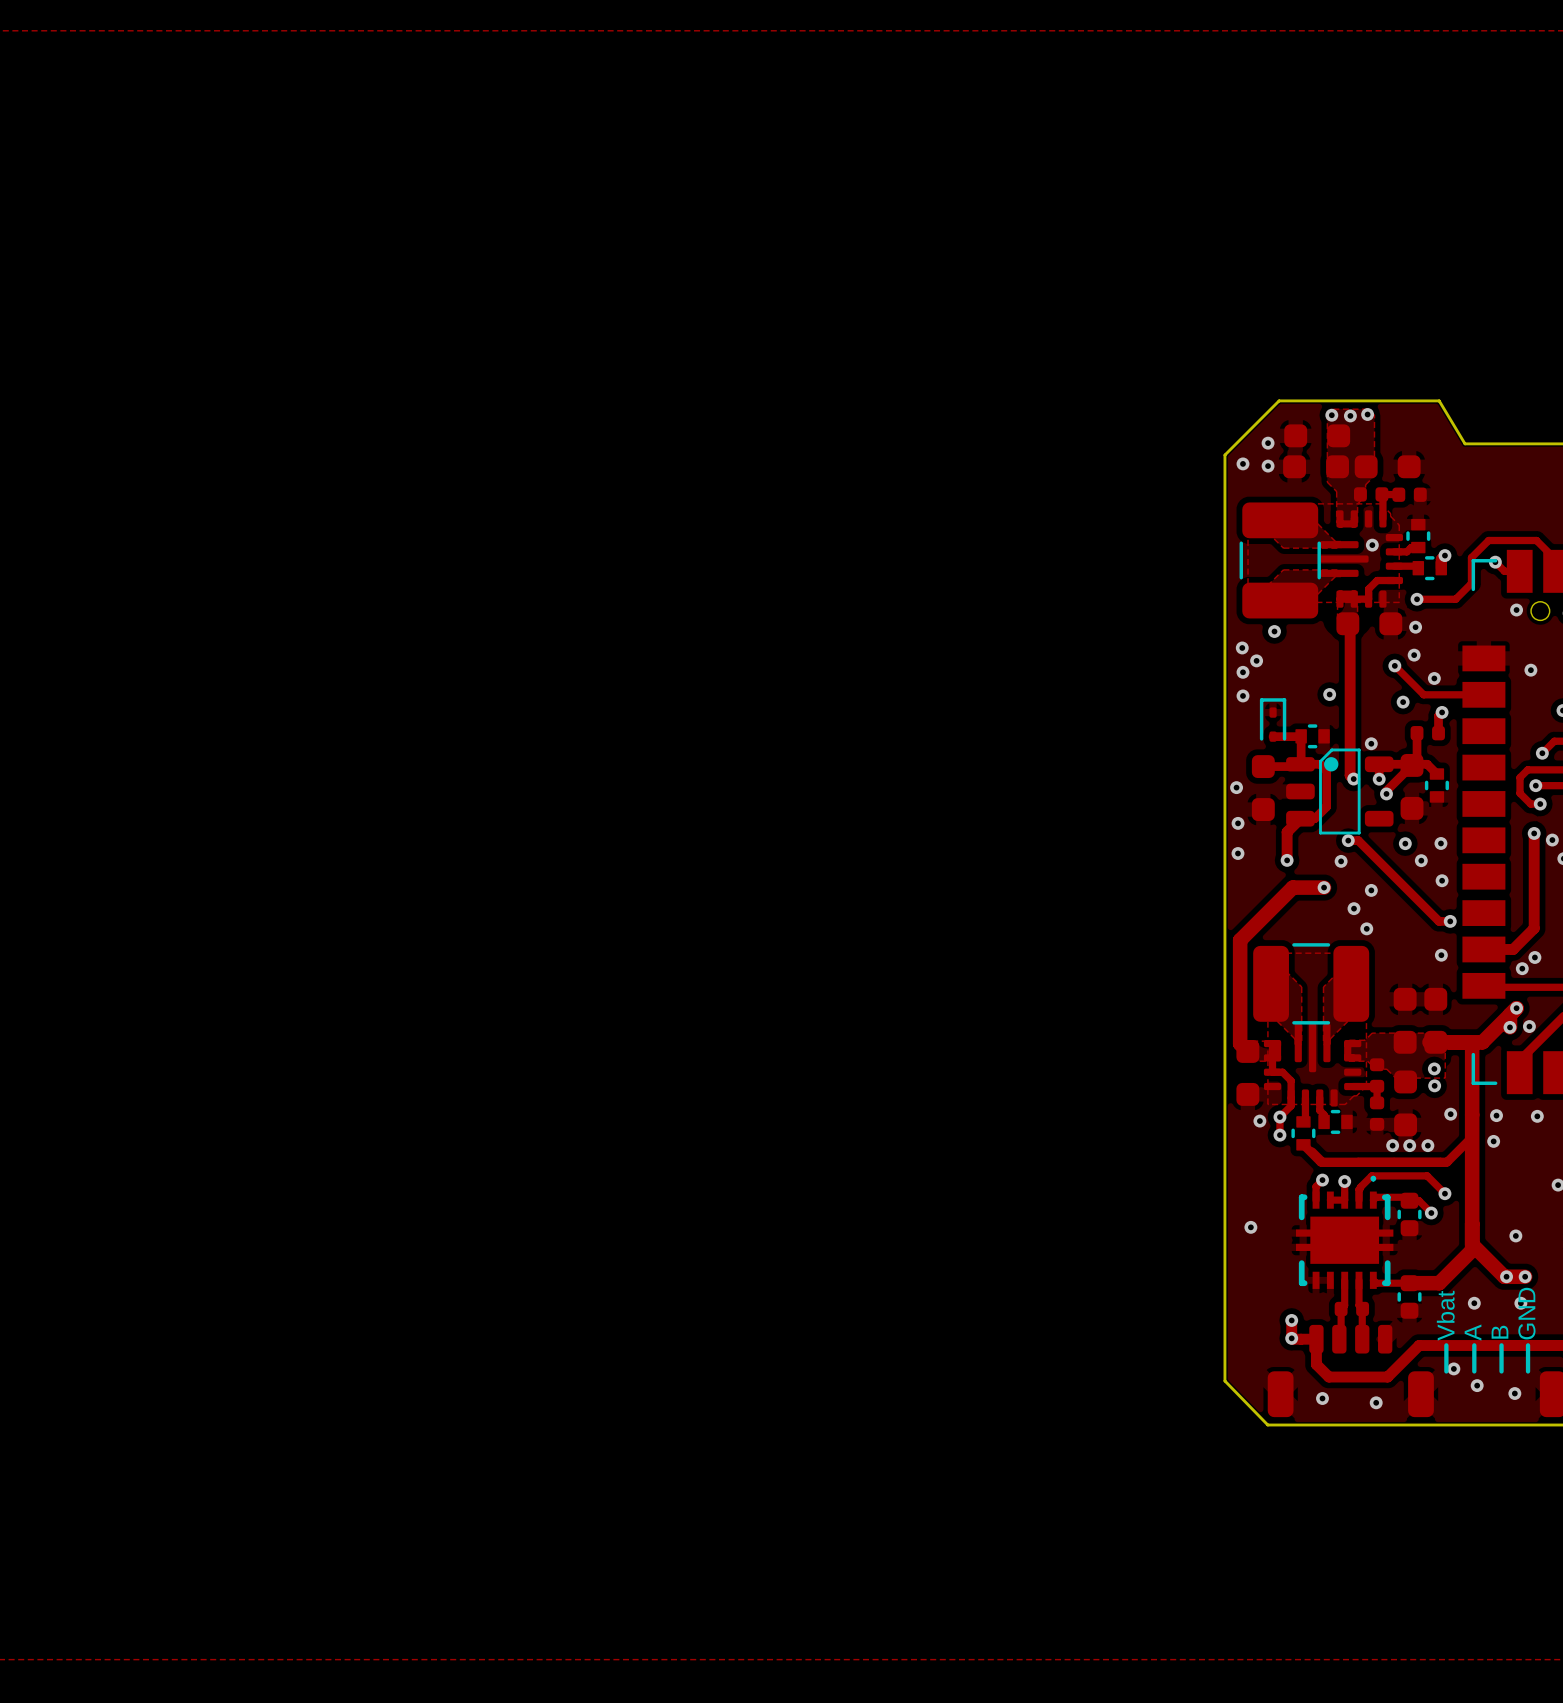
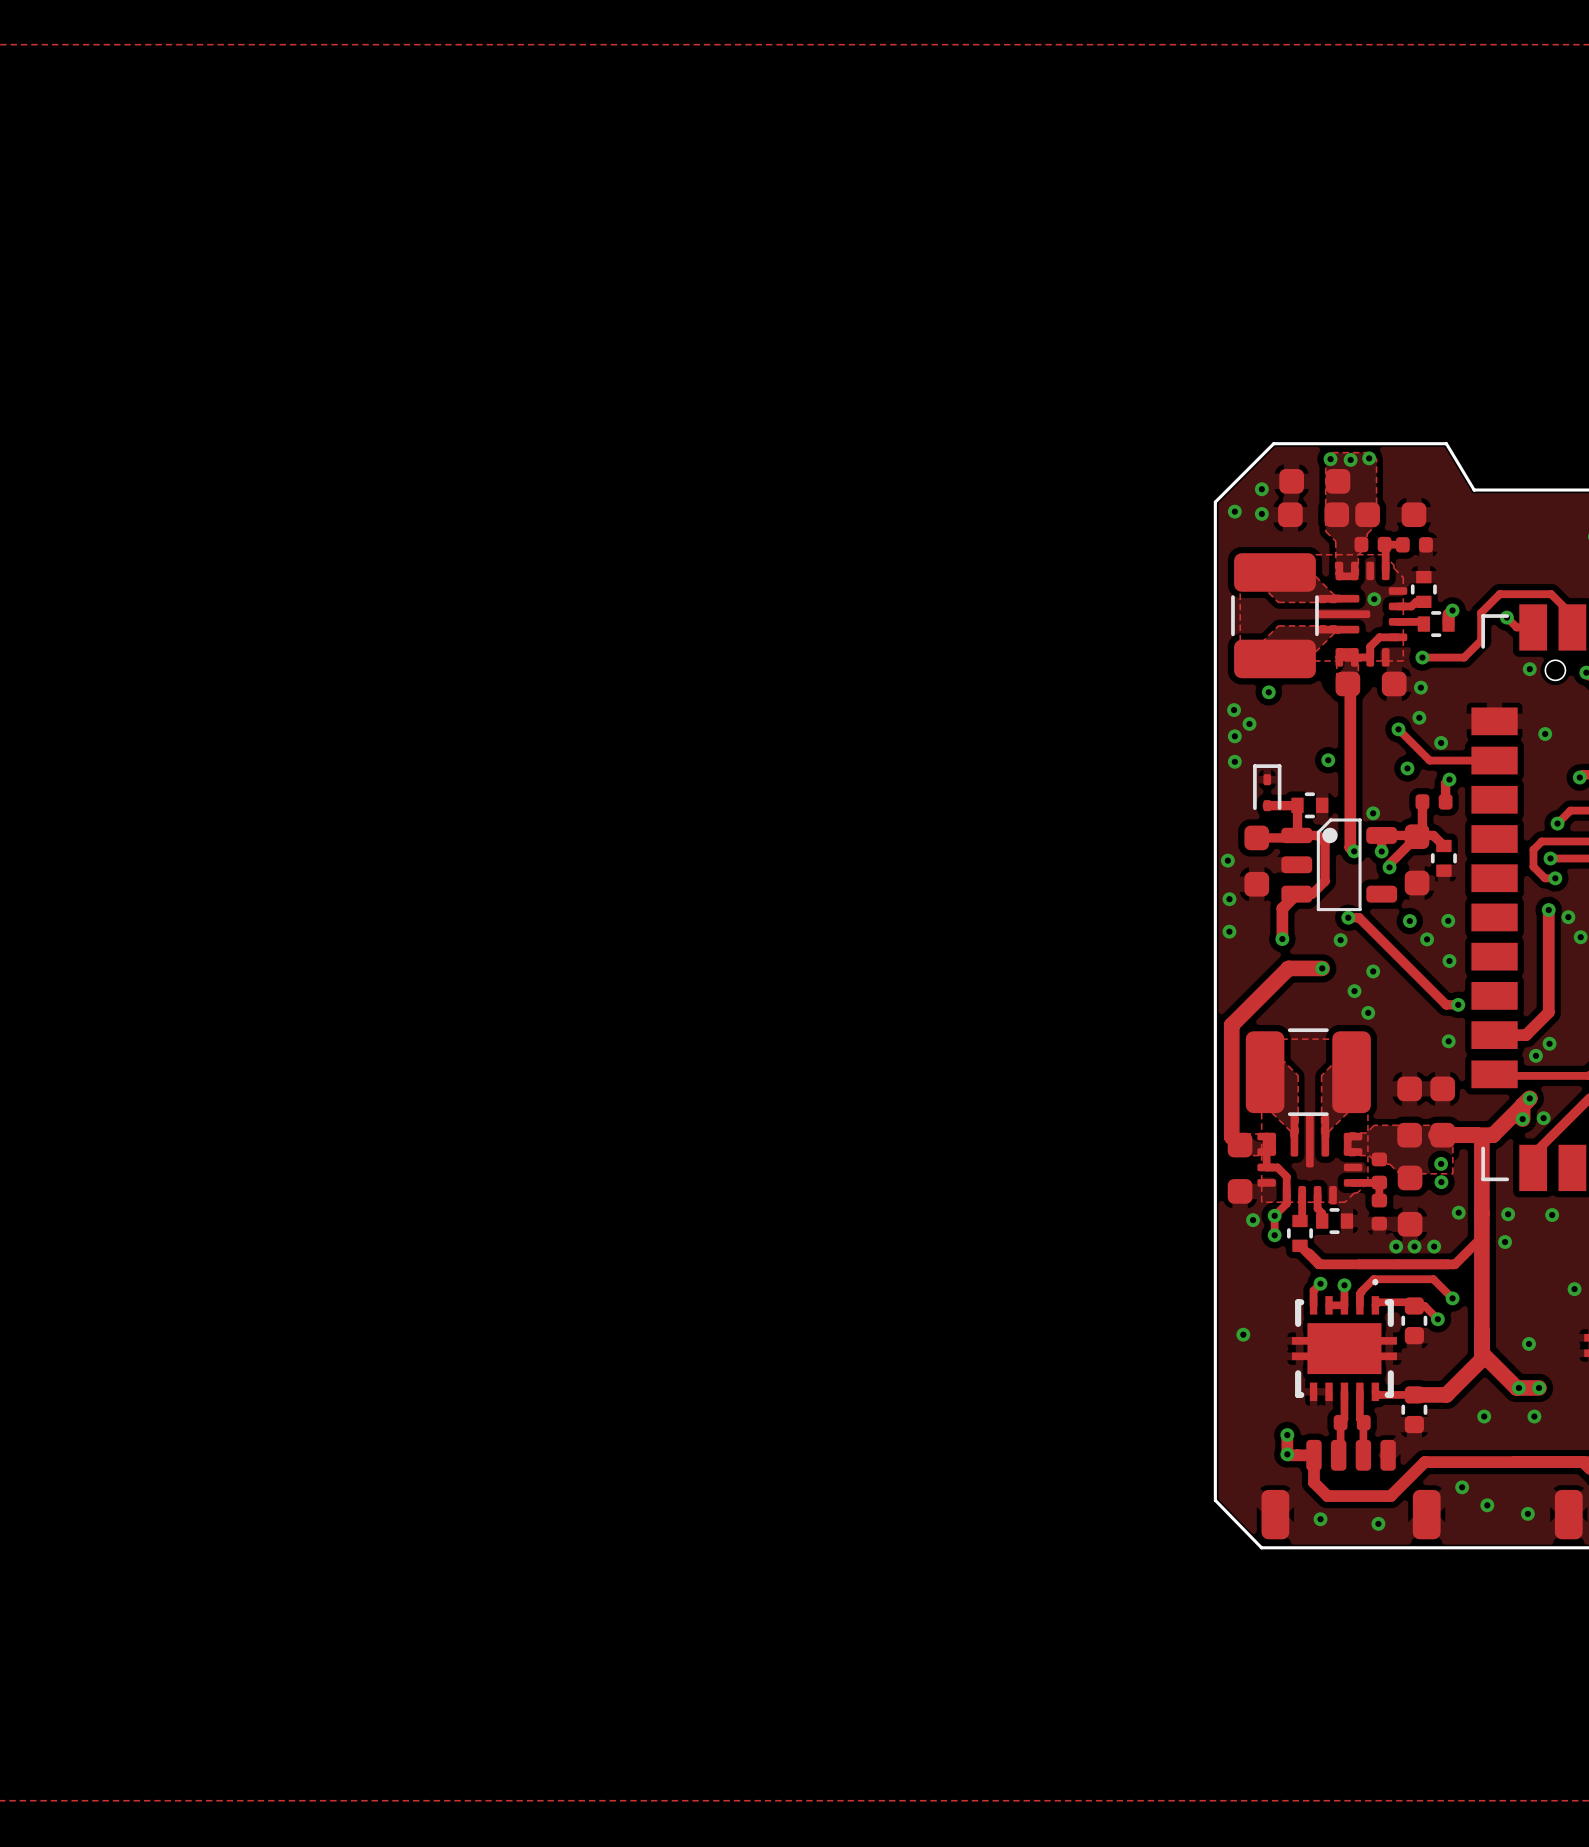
text: GND (1526, 1313) -> none
text: Vbat (1445, 1315) -> none
text: A (1473, 1332) -> none
text: B (1499, 1332) -> none
line: (1446, 1345) (1446, 1371) -> none
line: (1474, 1345) (1474, 1371) -> none
line: (1501, 1345) (1501, 1371) -> none
line: (1528, 1345) (1528, 1371) -> none

